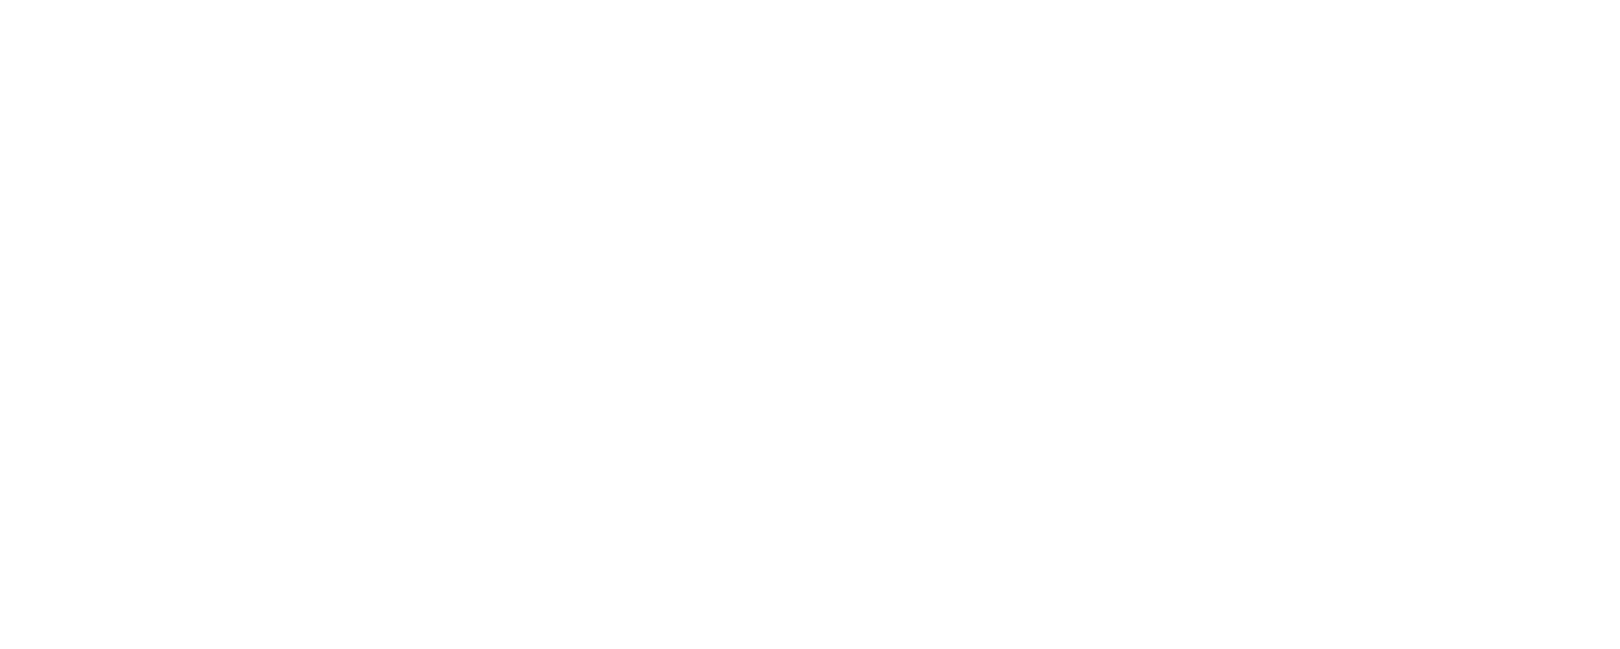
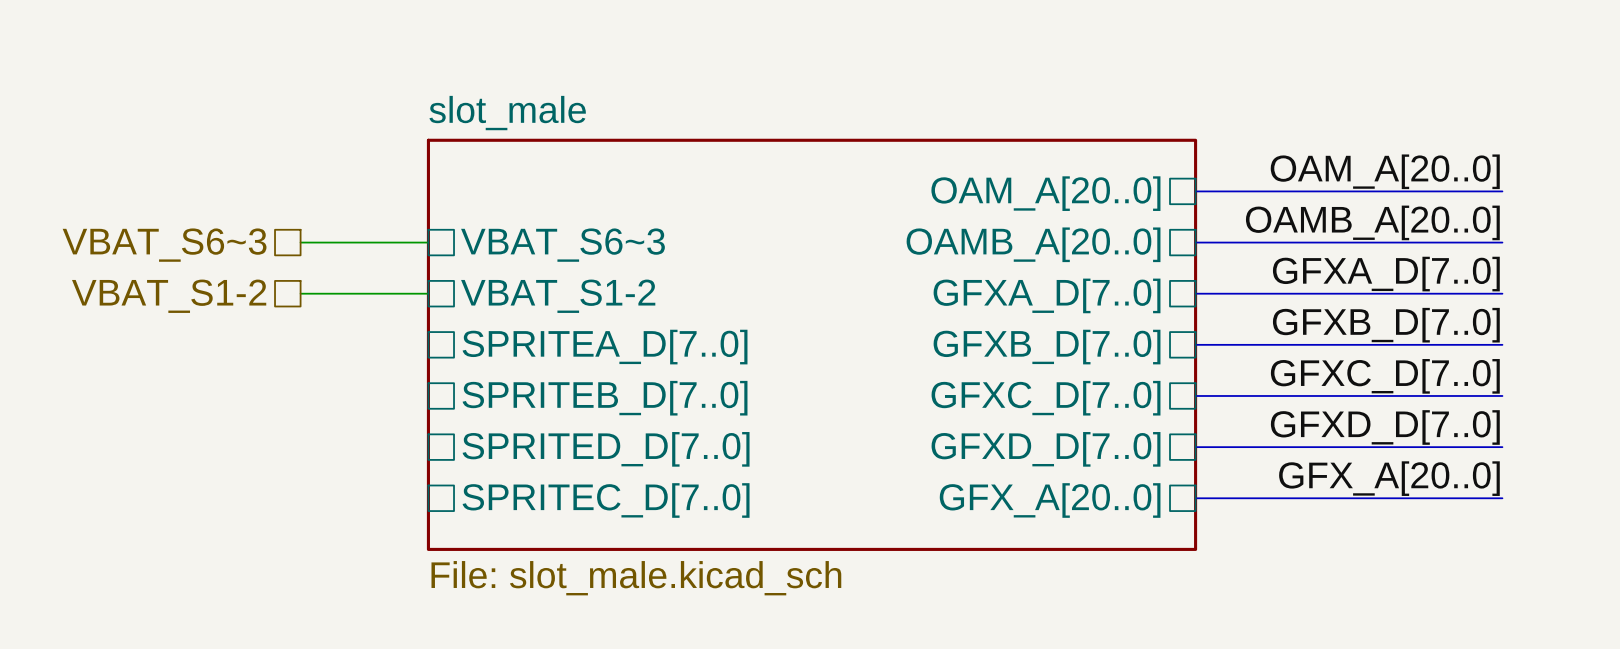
label: none -> OAM_A[20..0] (1385, 171)
bus: none -> (1195, 191) (1502, 191)
sheet pin: none -> OAM_A[20..0] (1045, 193)
label: none -> OAMB_A[20..0] (1372, 222)
wire: none -> (300, 242) (428, 242)
bus: none -> (1195, 242) (1502, 242)
hierarchical label: none -> VBAT_S6~3 (164, 245)
sheet pin: none -> VBAT_S6~3 (562, 245)
sheet pin: none -> OAMB_A[20..0] (1033, 244)
label: none -> GFXA_D[7..0] (1386, 274)
wire: none -> (300, 293) (428, 293)
bus: none -> (1195, 293) (1502, 293)
hierarchical label: none -> VBAT_S1-2 (169, 296)
sheet pin: none -> VBAT_S1-2 (558, 296)
sheet pin: none -> GFXA_D[7..0] (1047, 295)
label: none -> GFXB_D[7..0] (1386, 325)
sheet slot_male: none -> File: slot_male.kicad_sch (812, 344)
bus: none -> (1195, 344) (1502, 344)
sheet pin: none -> SPRITEA_D[7..0] (605, 347)
sheet pin: none -> GFXB_D[7..0] (1047, 347)
label: none -> GFXC_D[7..0] (1385, 376)
bus: none -> (1195, 395) (1502, 395)
sheet pin: none -> SPRITEB_D[7..0] (605, 398)
sheet pin: none -> GFXC_D[7..0] (1046, 398)
label: none -> GFXD_D[7..0] (1385, 427)
bus: none -> (1195, 447) (1502, 447)
sheet pin: none -> SPRITED_D[7..0] (606, 449)
sheet pin: none -> GFXD_D[7..0] (1046, 449)
label: none -> GFX_A[20..0] (1389, 478)
bus: none -> (1195, 498) (1502, 498)
sheet pin: none -> SPRITEC_D[7..0] (606, 500)
sheet pin: none -> GFX_A[20..0] (1050, 500)

